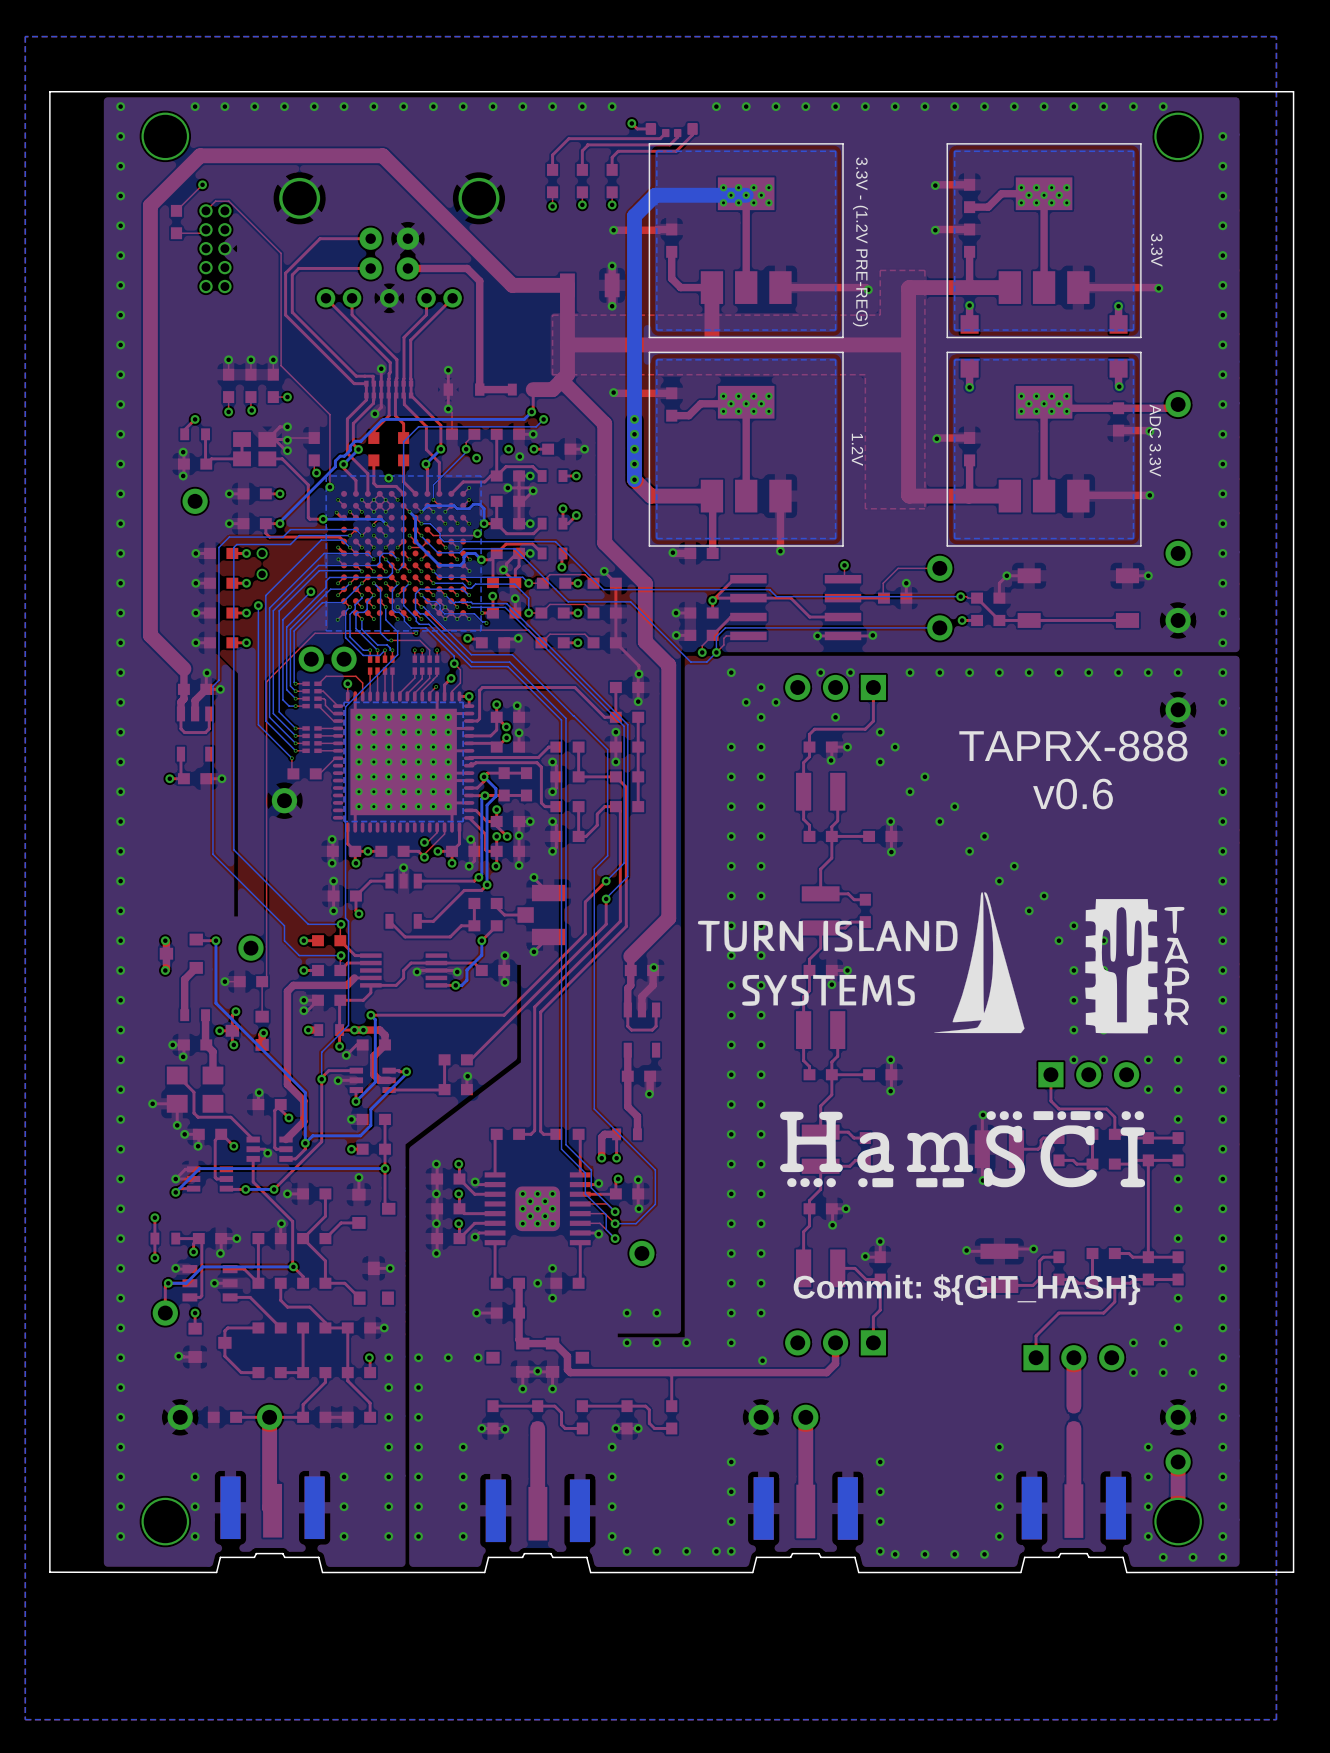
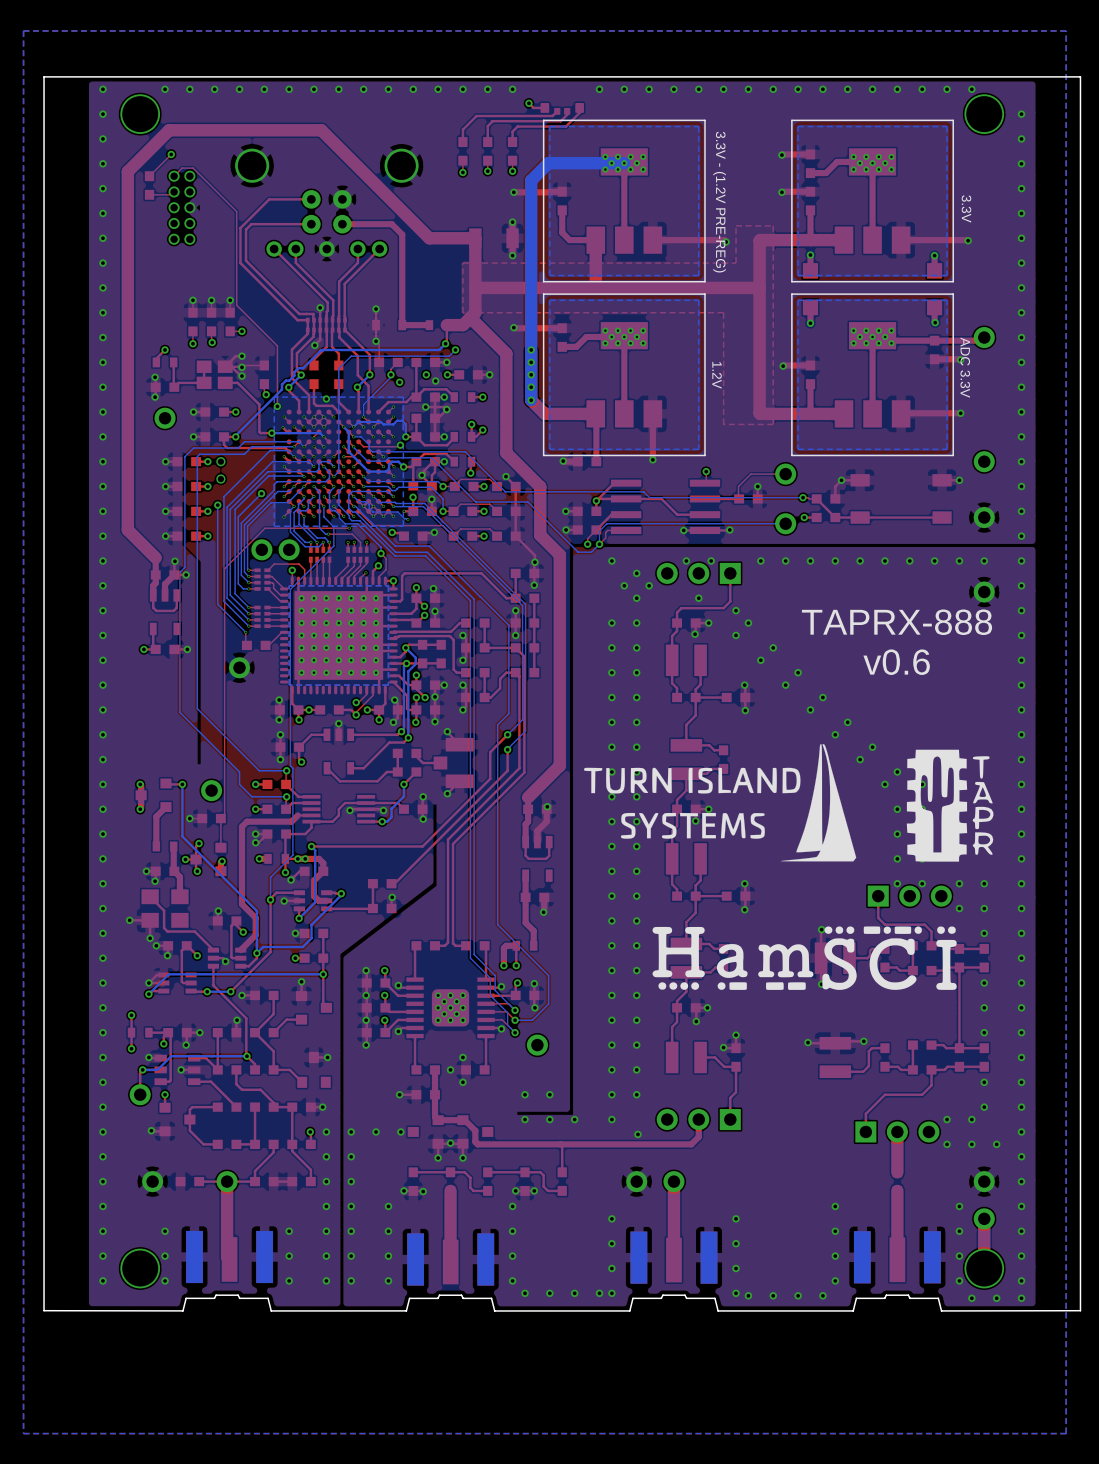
text: Commit: ${GIT_HASH} (966, 1289) -> none

